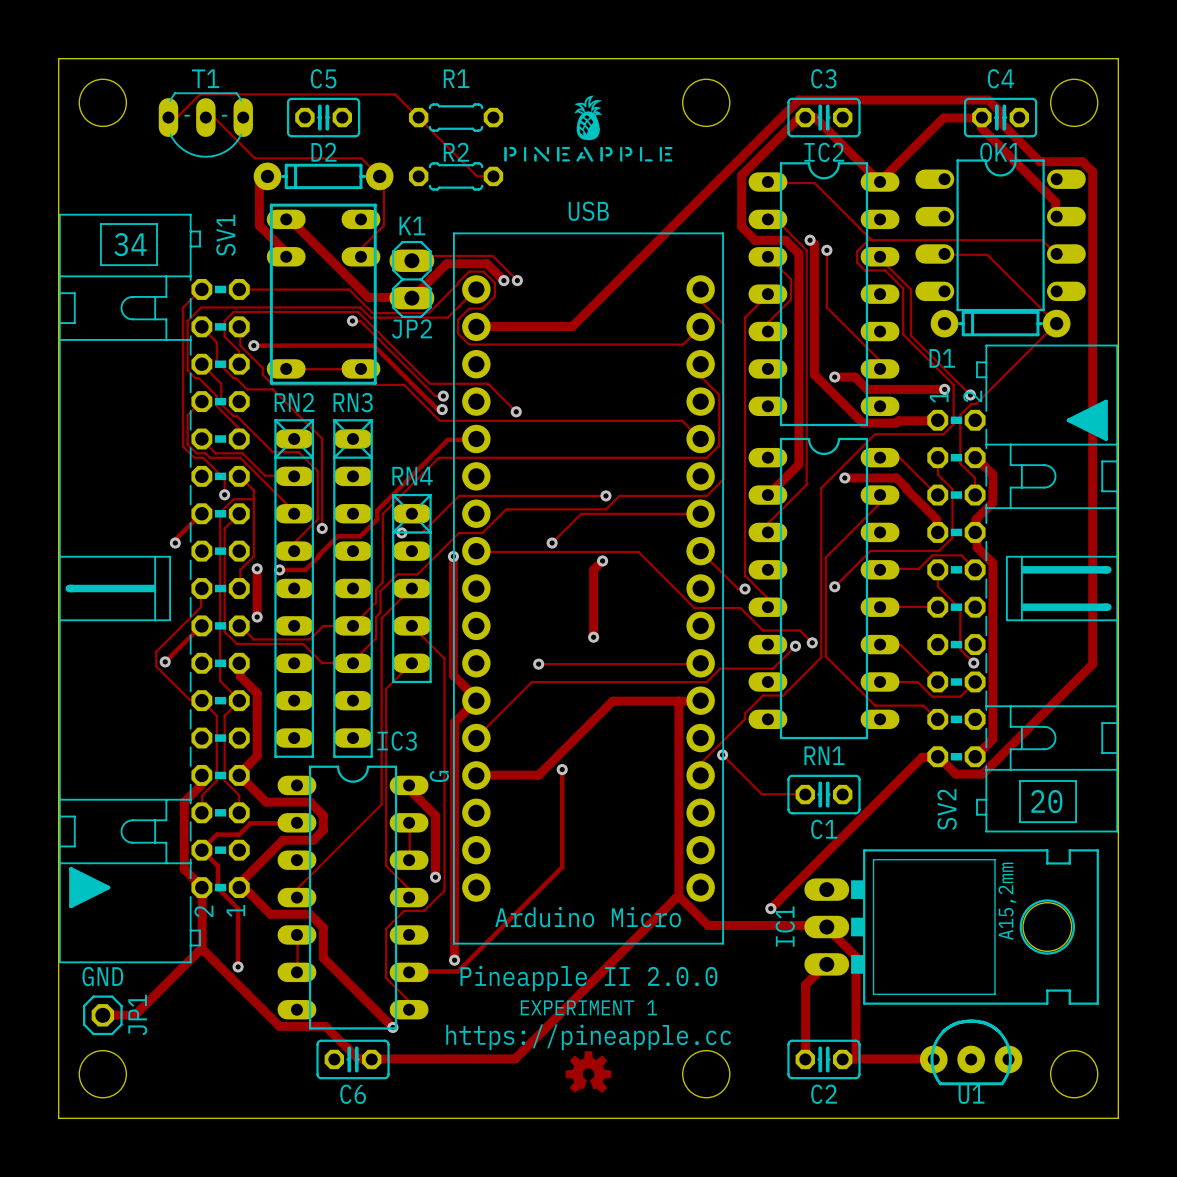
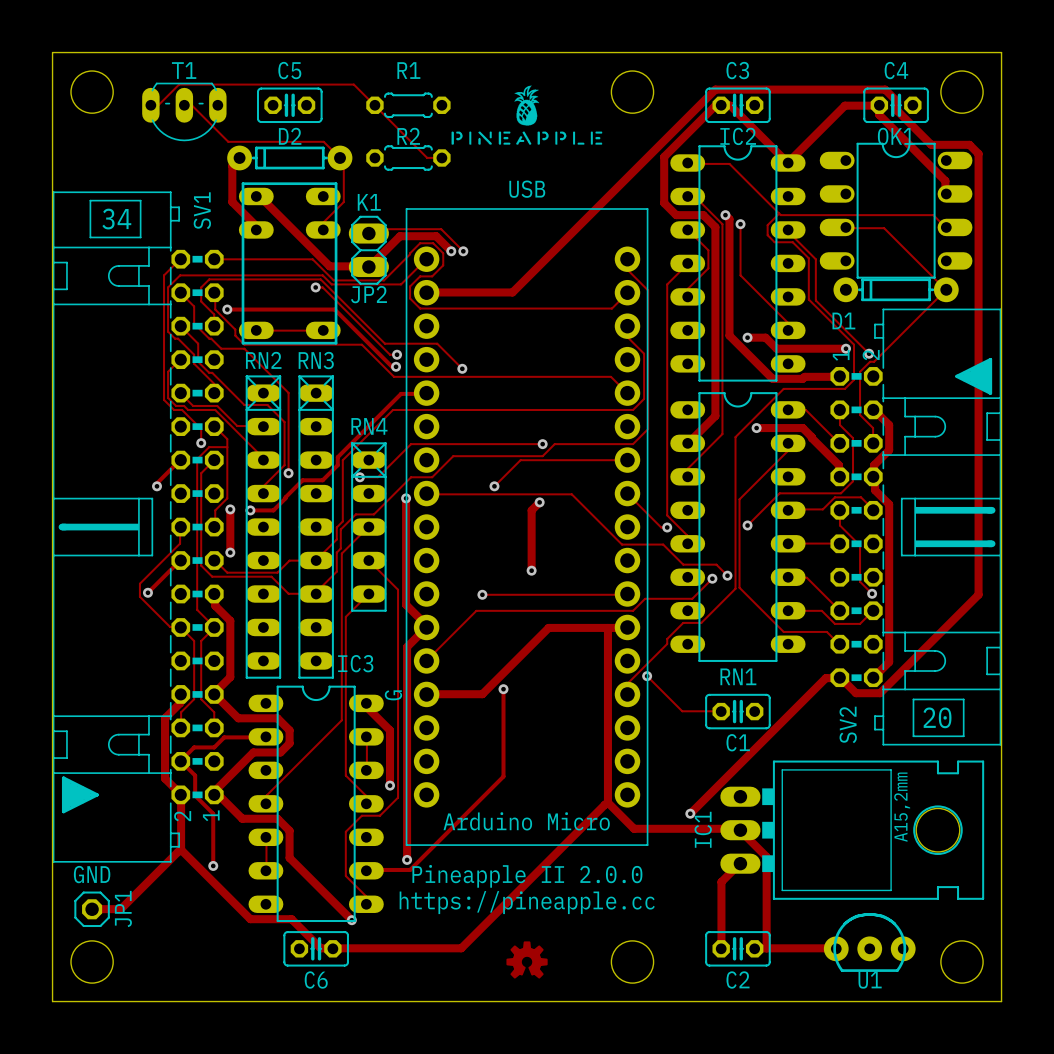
text: EXPERIMENT 1 (588, 1007) -> https://pineapple.cc (527, 902)
text: https://pineapple.cc (588, 1037) -> none

